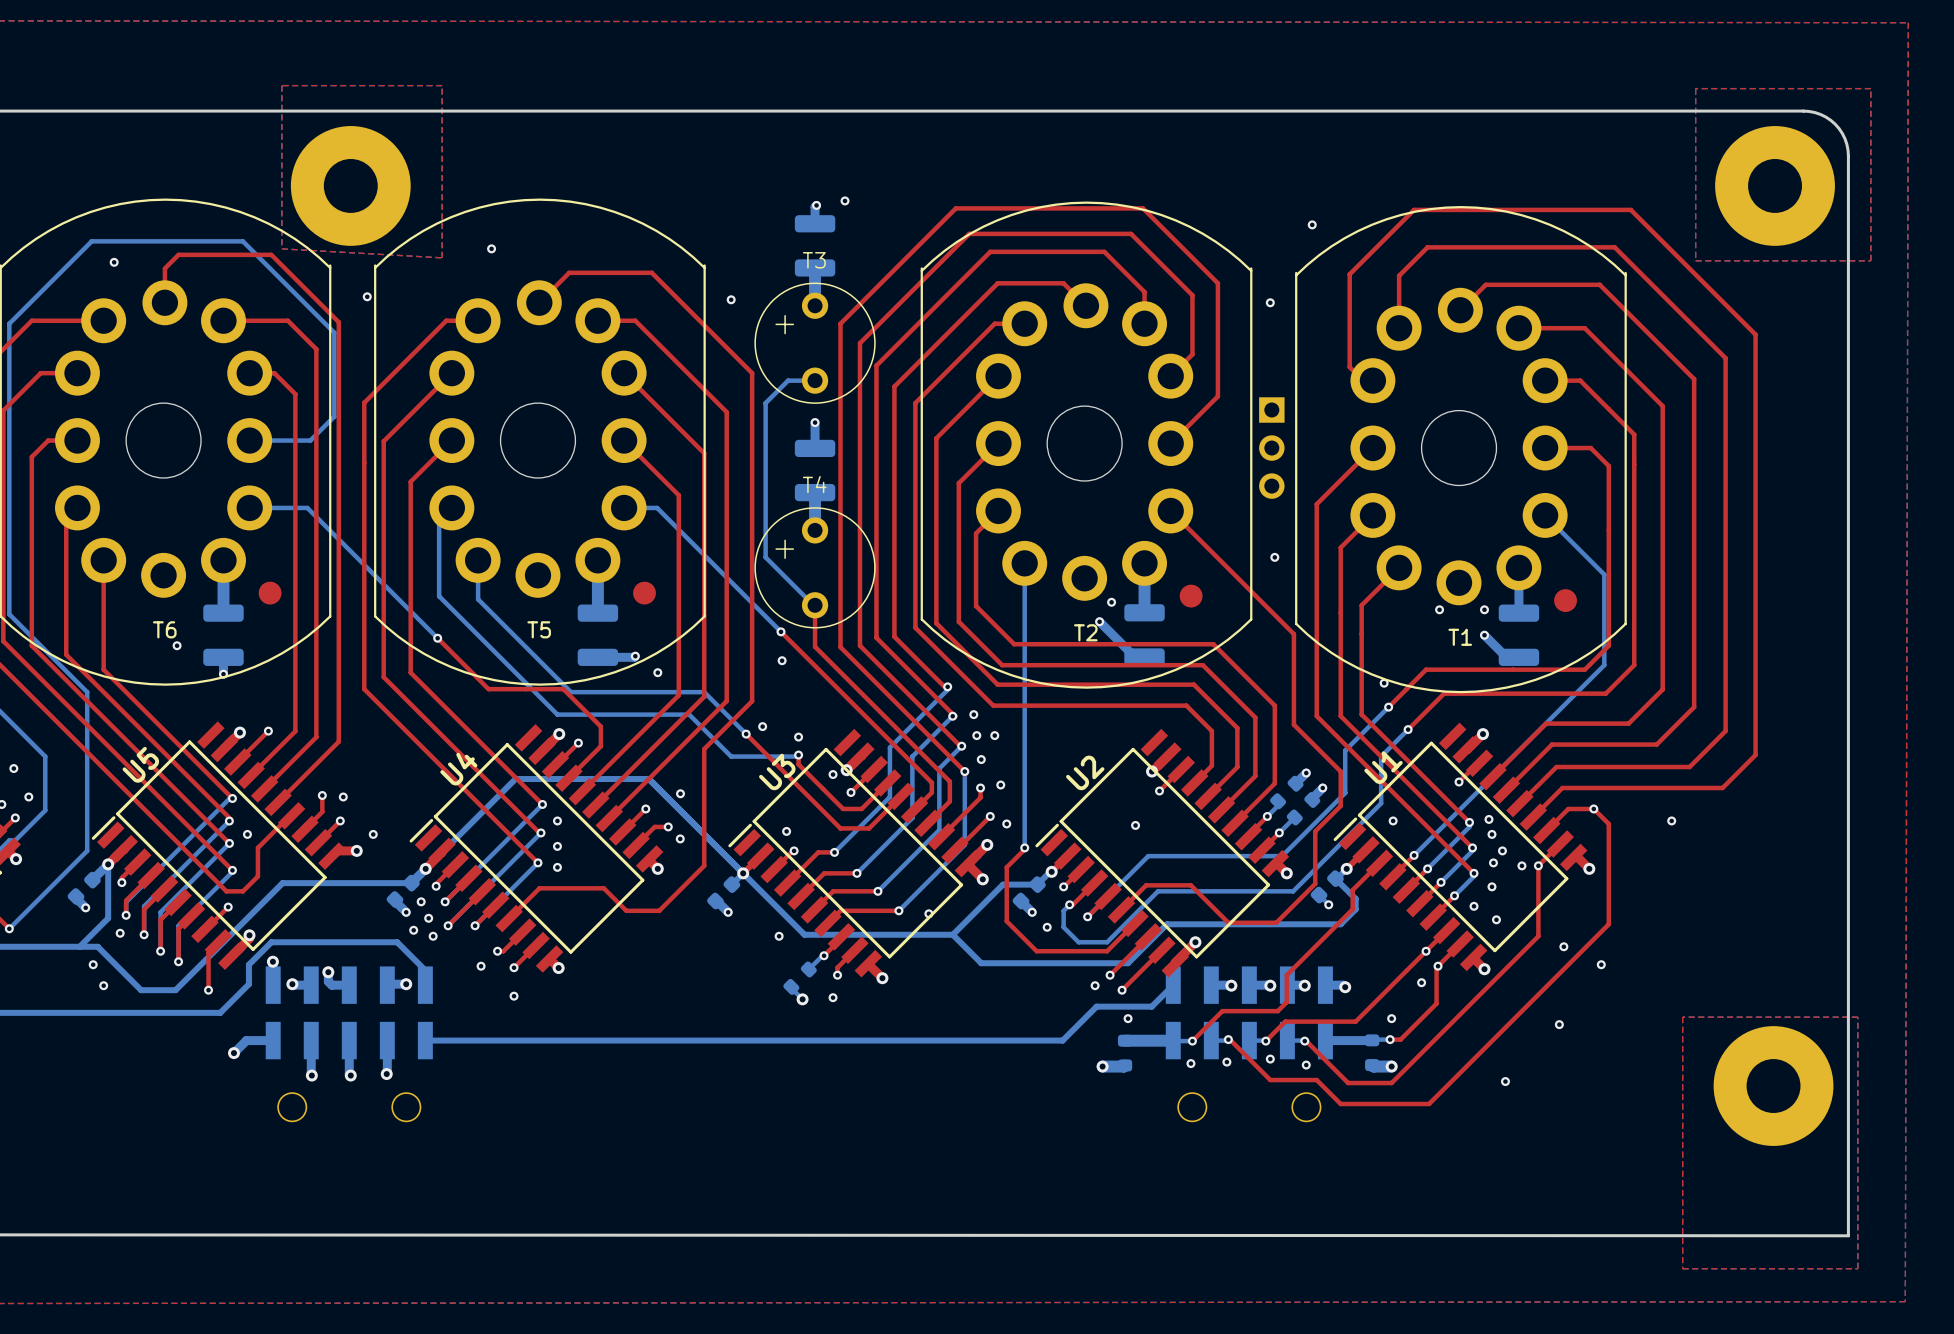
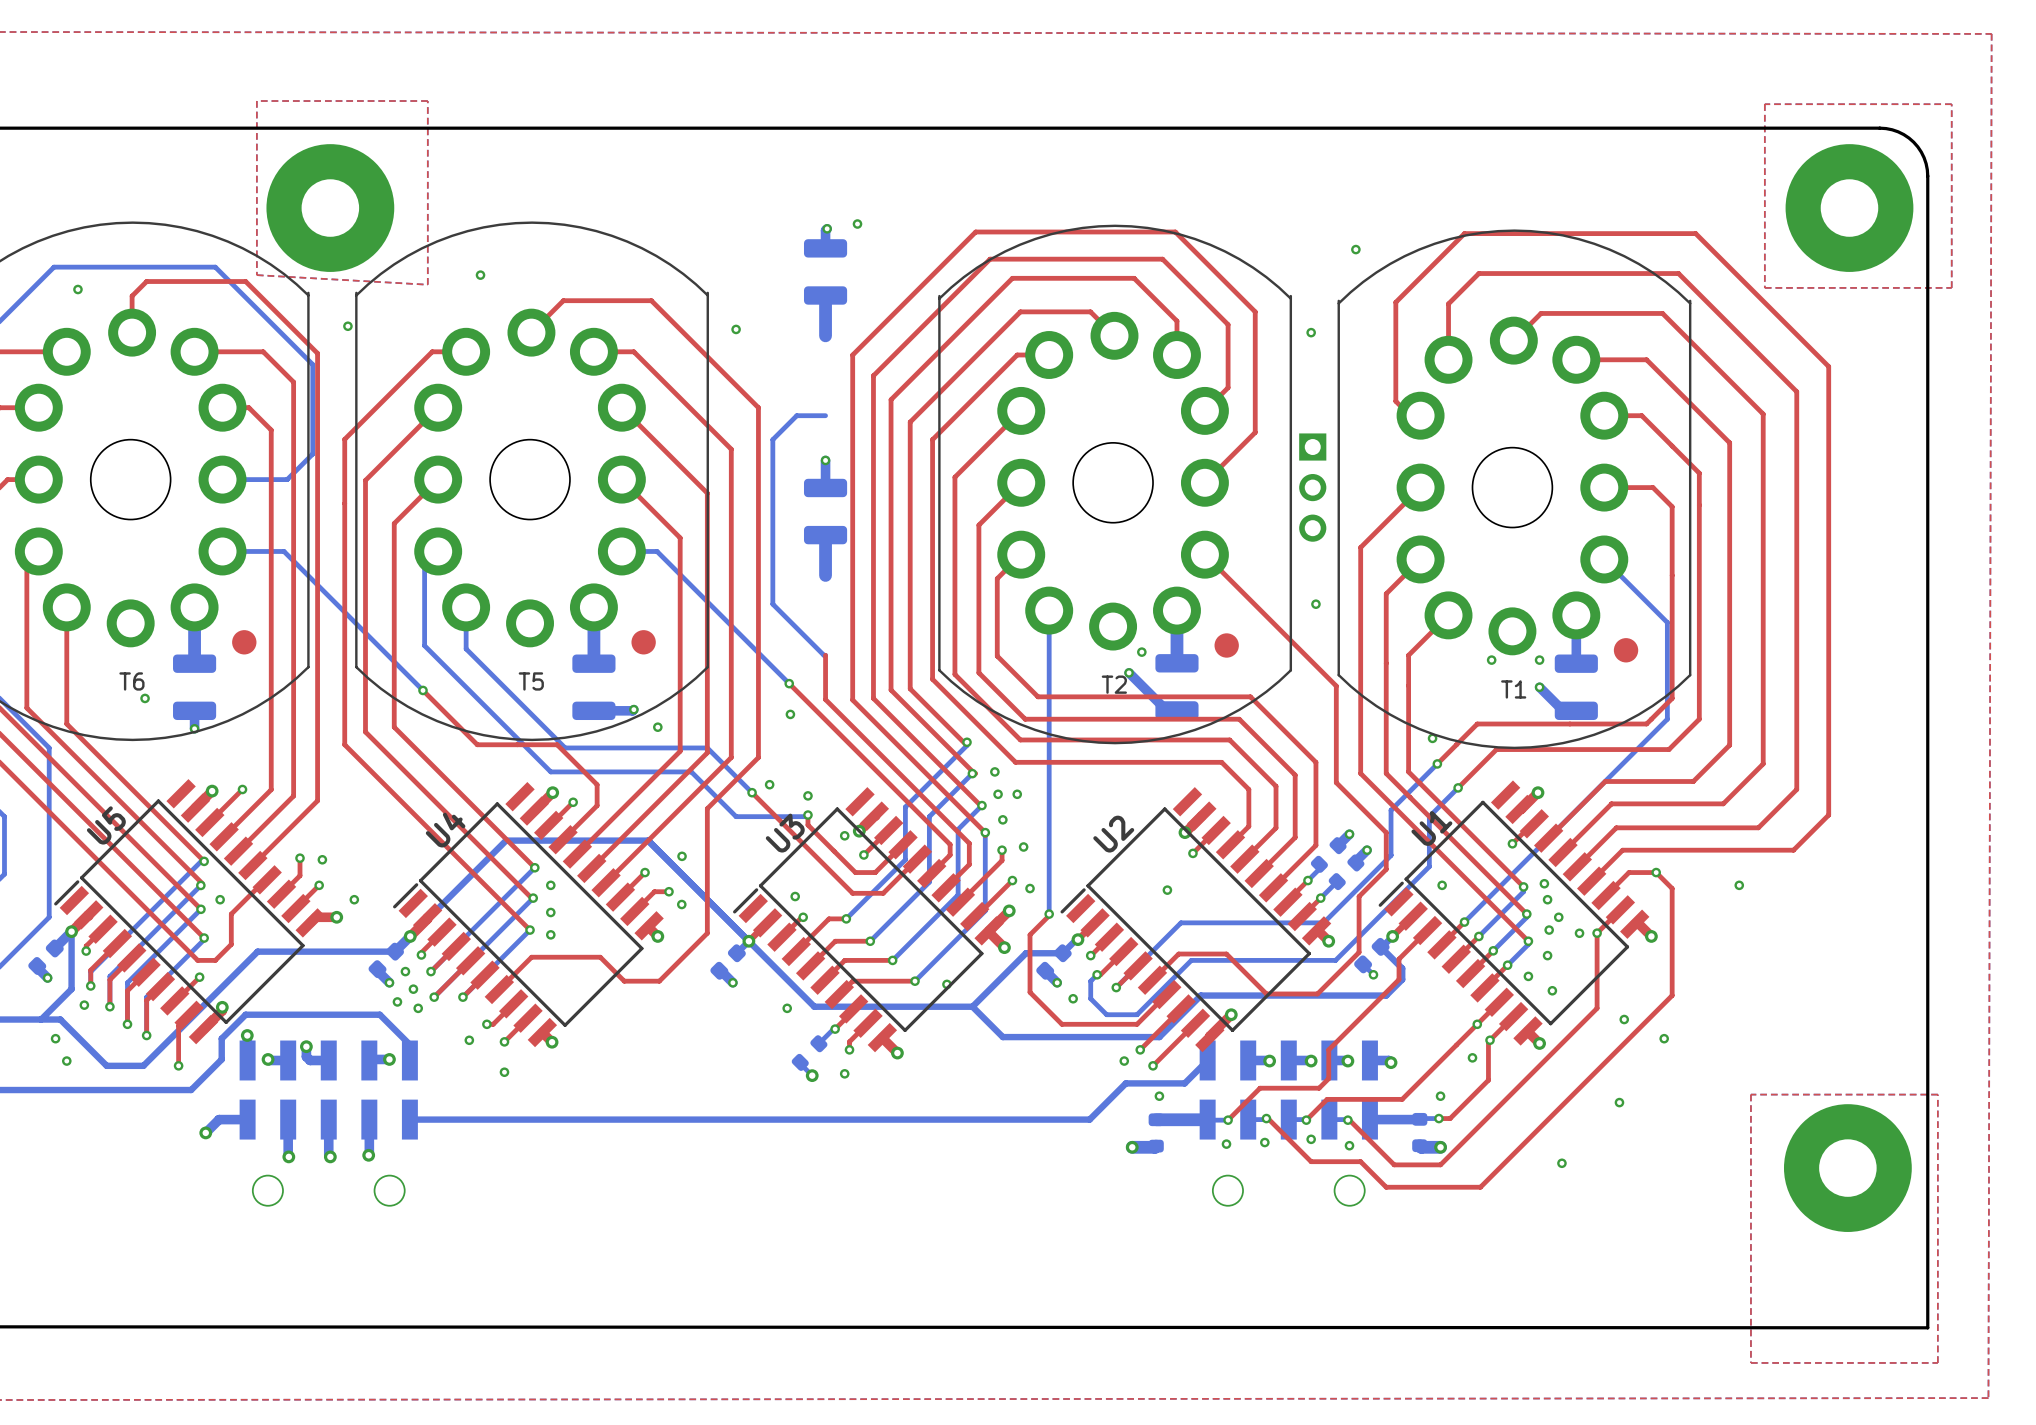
T3: (815, 343) -> none
T4: (815, 567) -> none

